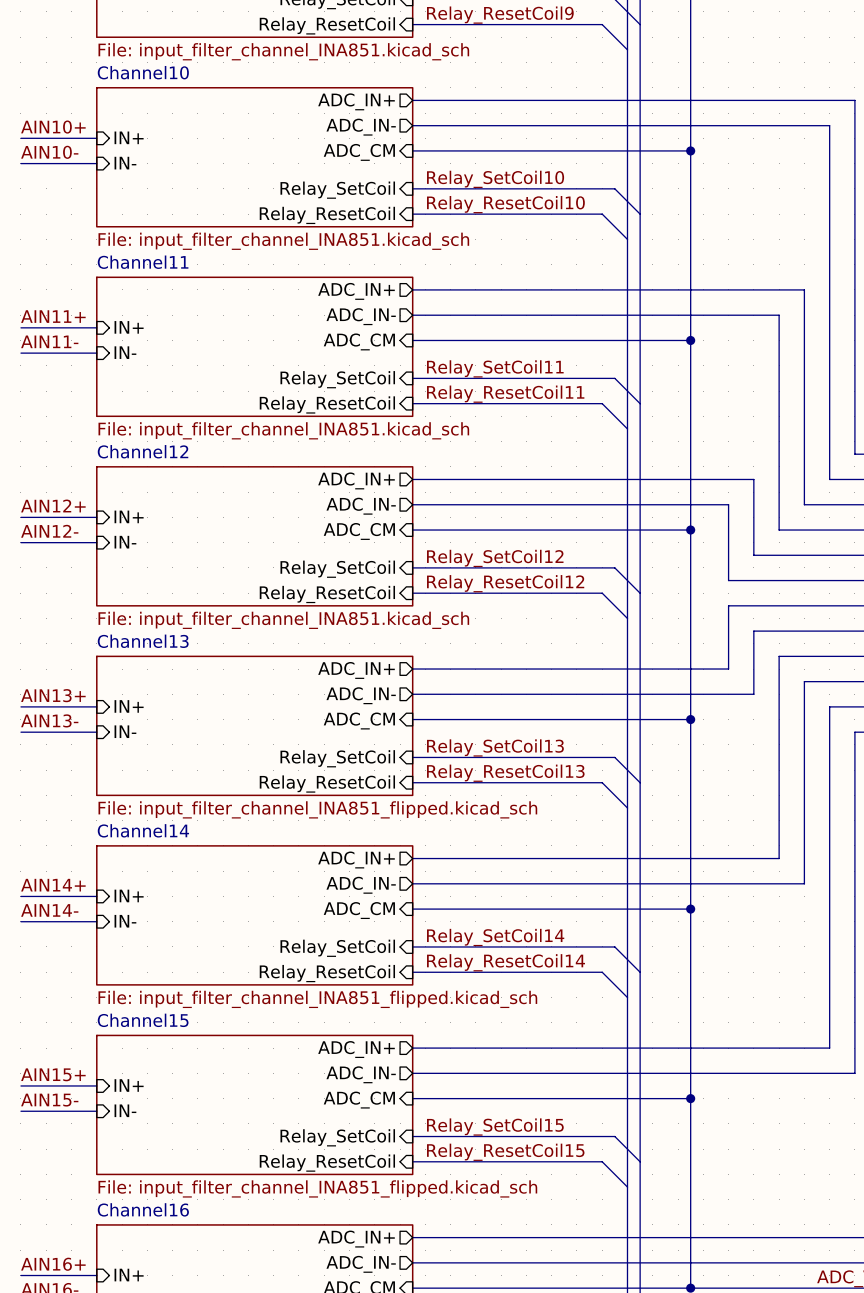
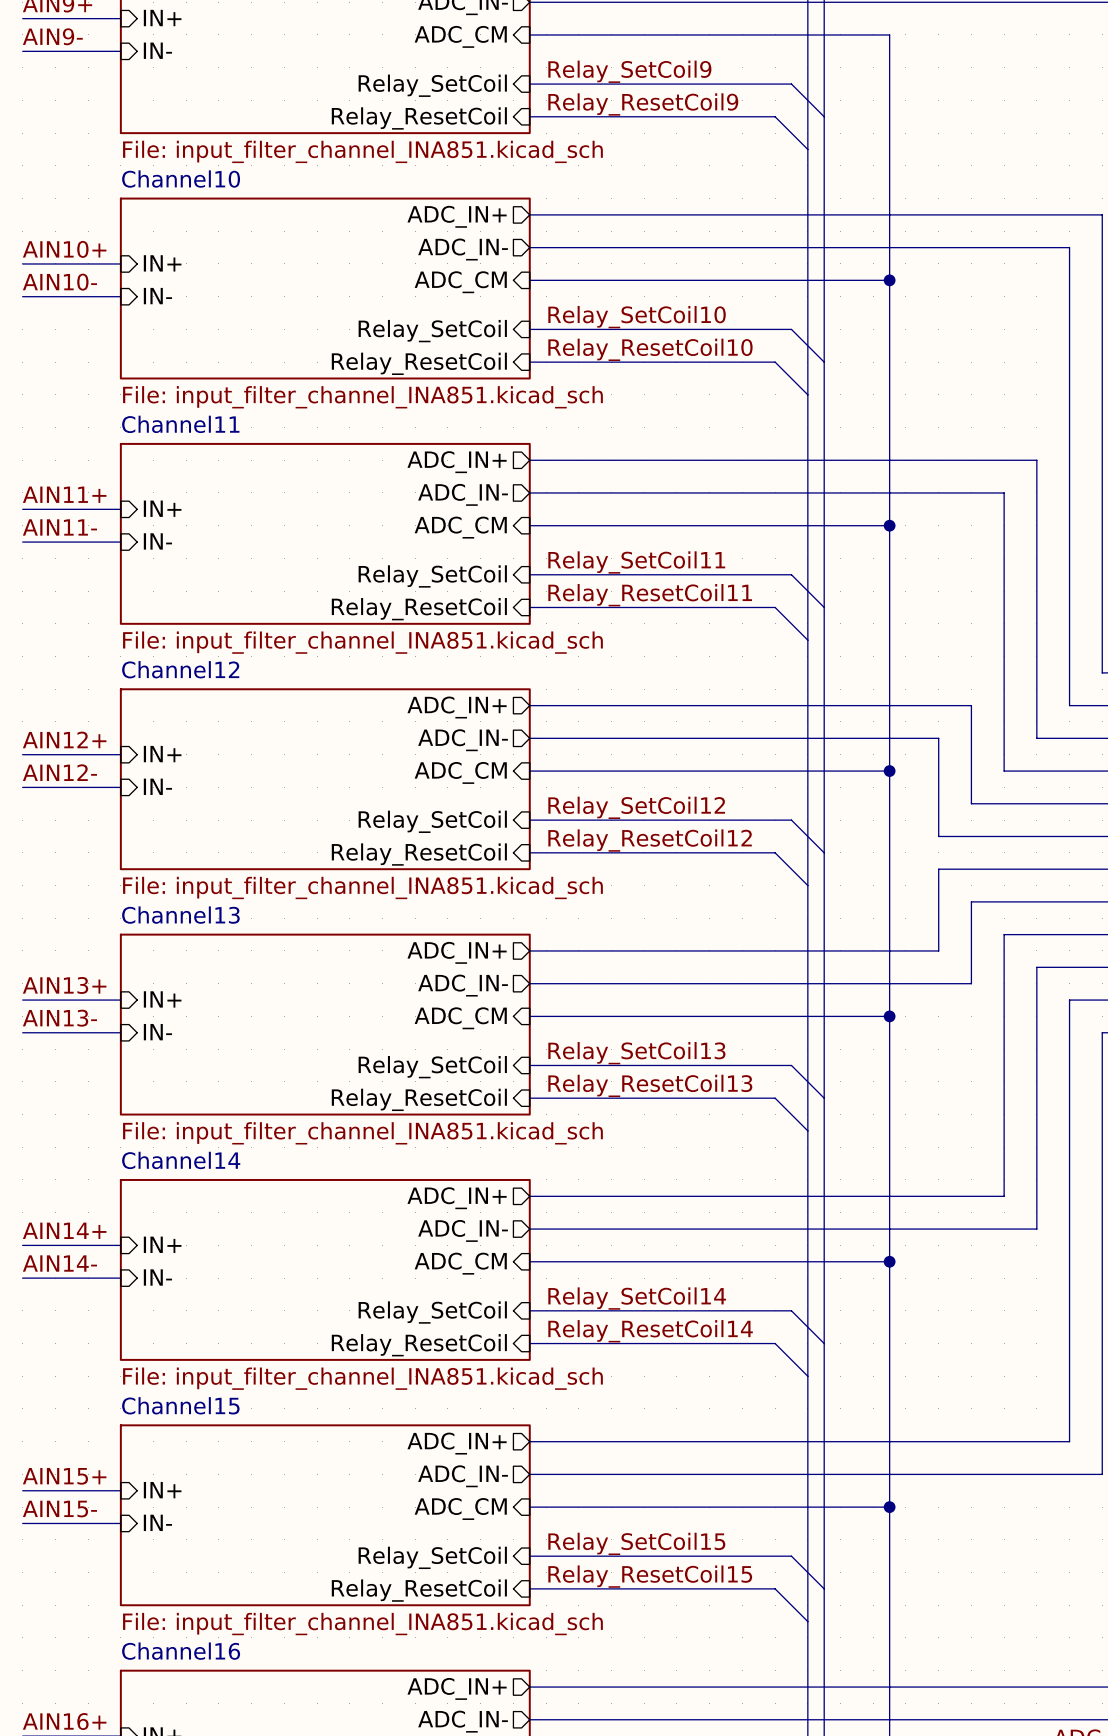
sheet Channel13 value: File: input_filter_channel_INA851_flipped.kicad_sch (317, 809) -> File: input_filter_channel_INA851.kicad_sch (362, 1133)
sheet Channel14 value: File: input_filter_channel_INA851_flipped.kicad_sch (317, 999) -> File: input_filter_channel_INA851.kicad_sch (362, 1378)
sheet Channel15 value: File: input_filter_channel_INA851_flipped.kicad_sch (317, 1188) -> File: input_filter_channel_INA851.kicad_sch (362, 1624)

